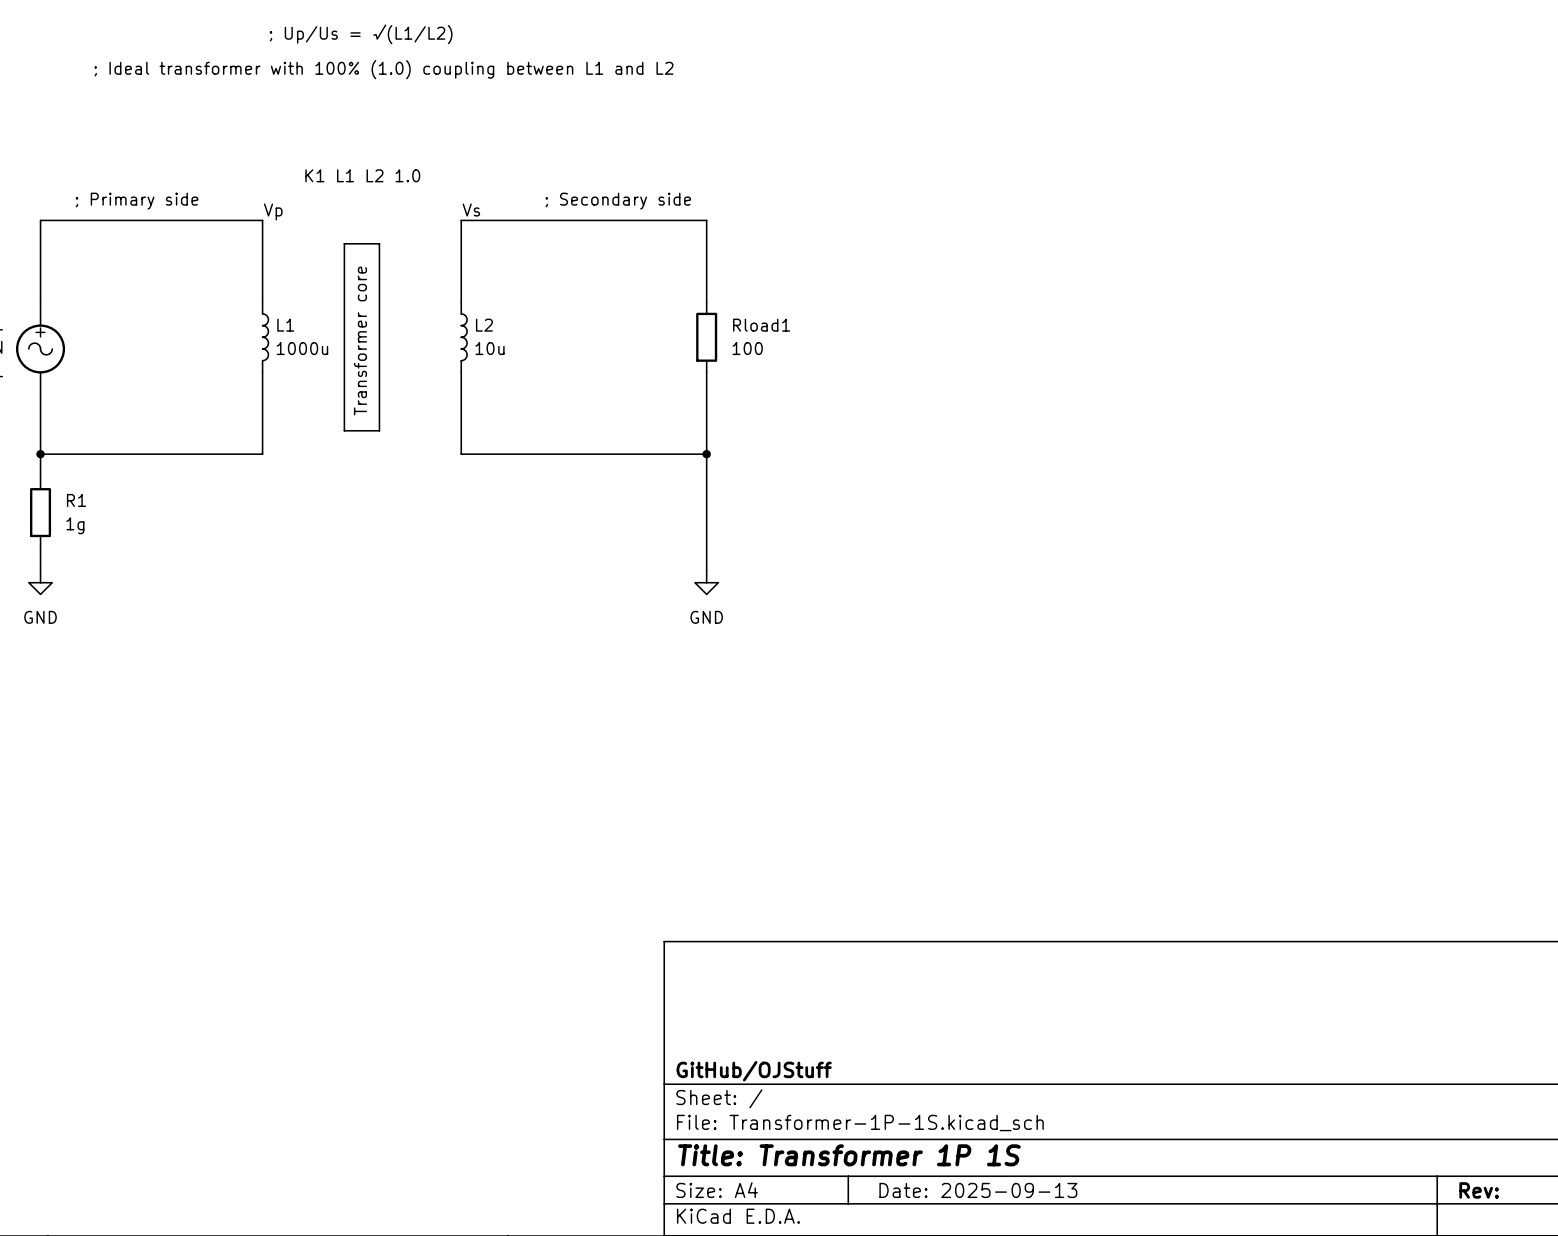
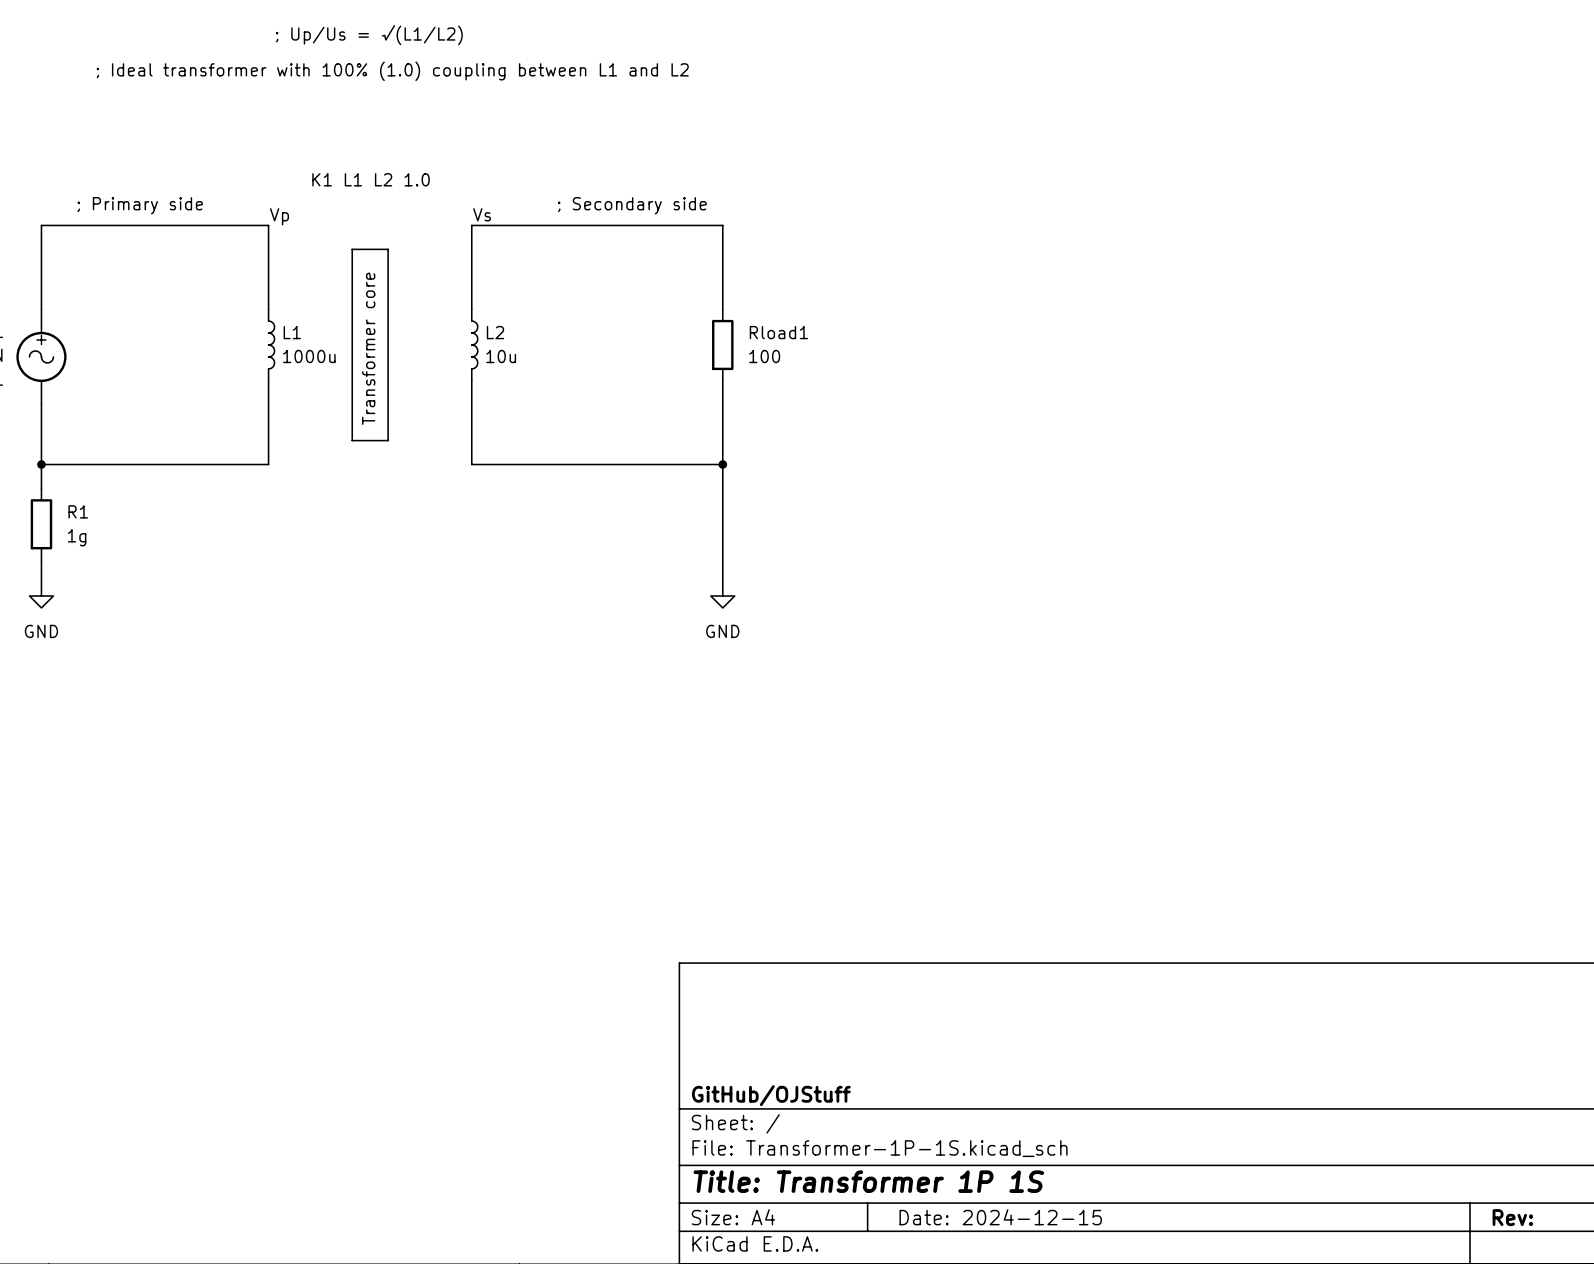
title block: Date: 2025-09-13 (978, 1190) -> Date: 2024-12-15 (1000, 1217)

